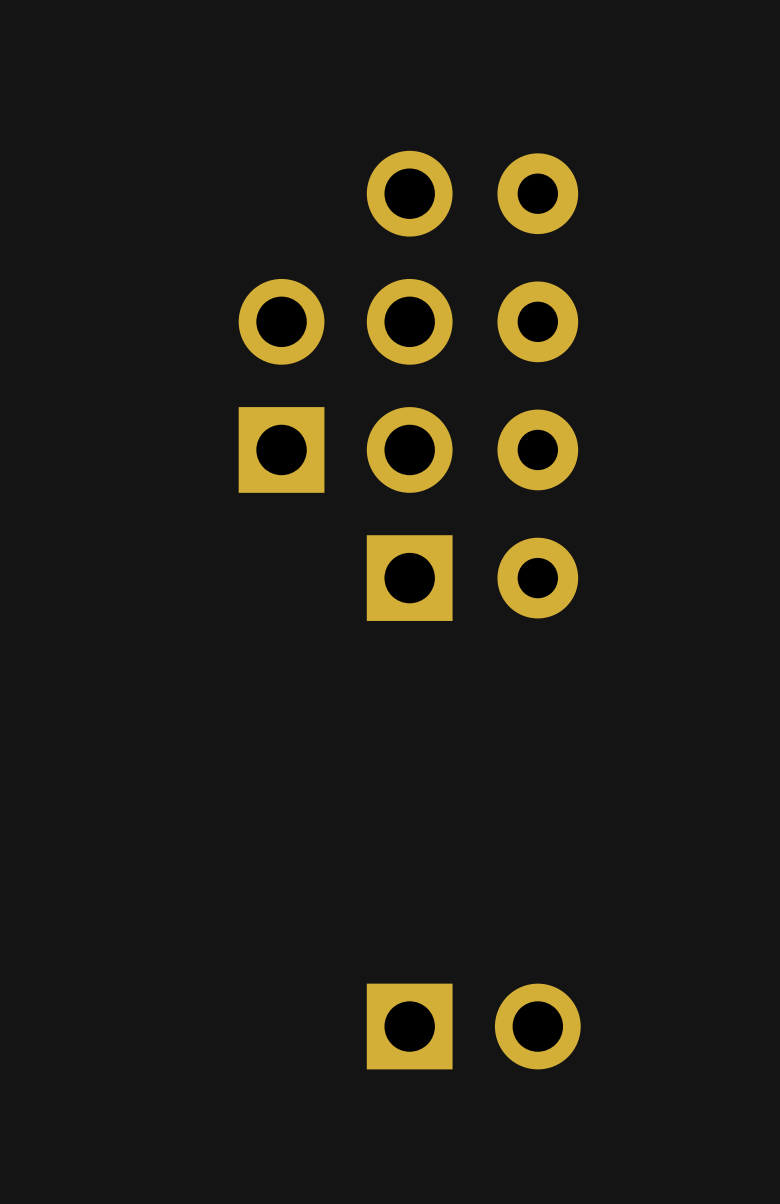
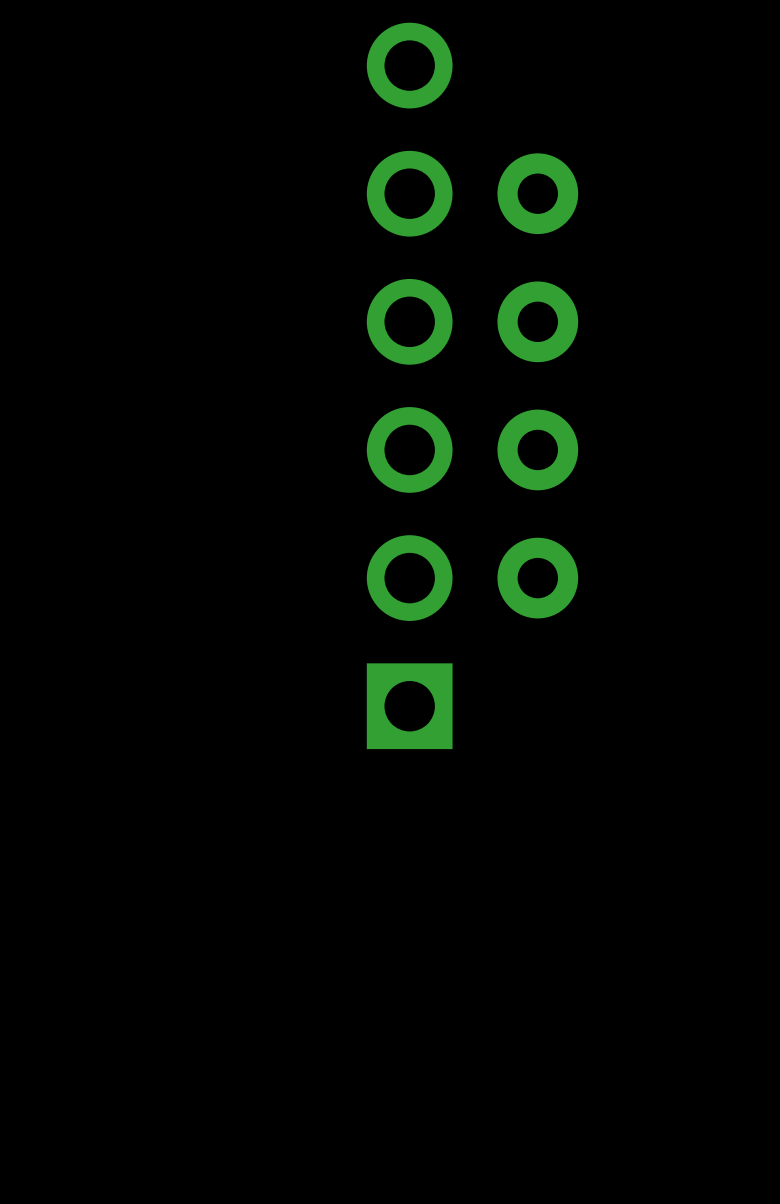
part footprint: [366, 150, 453, 621] -> [366, 22, 453, 750]
part: (281, 385) -> none
part: (473, 1026) -> none

